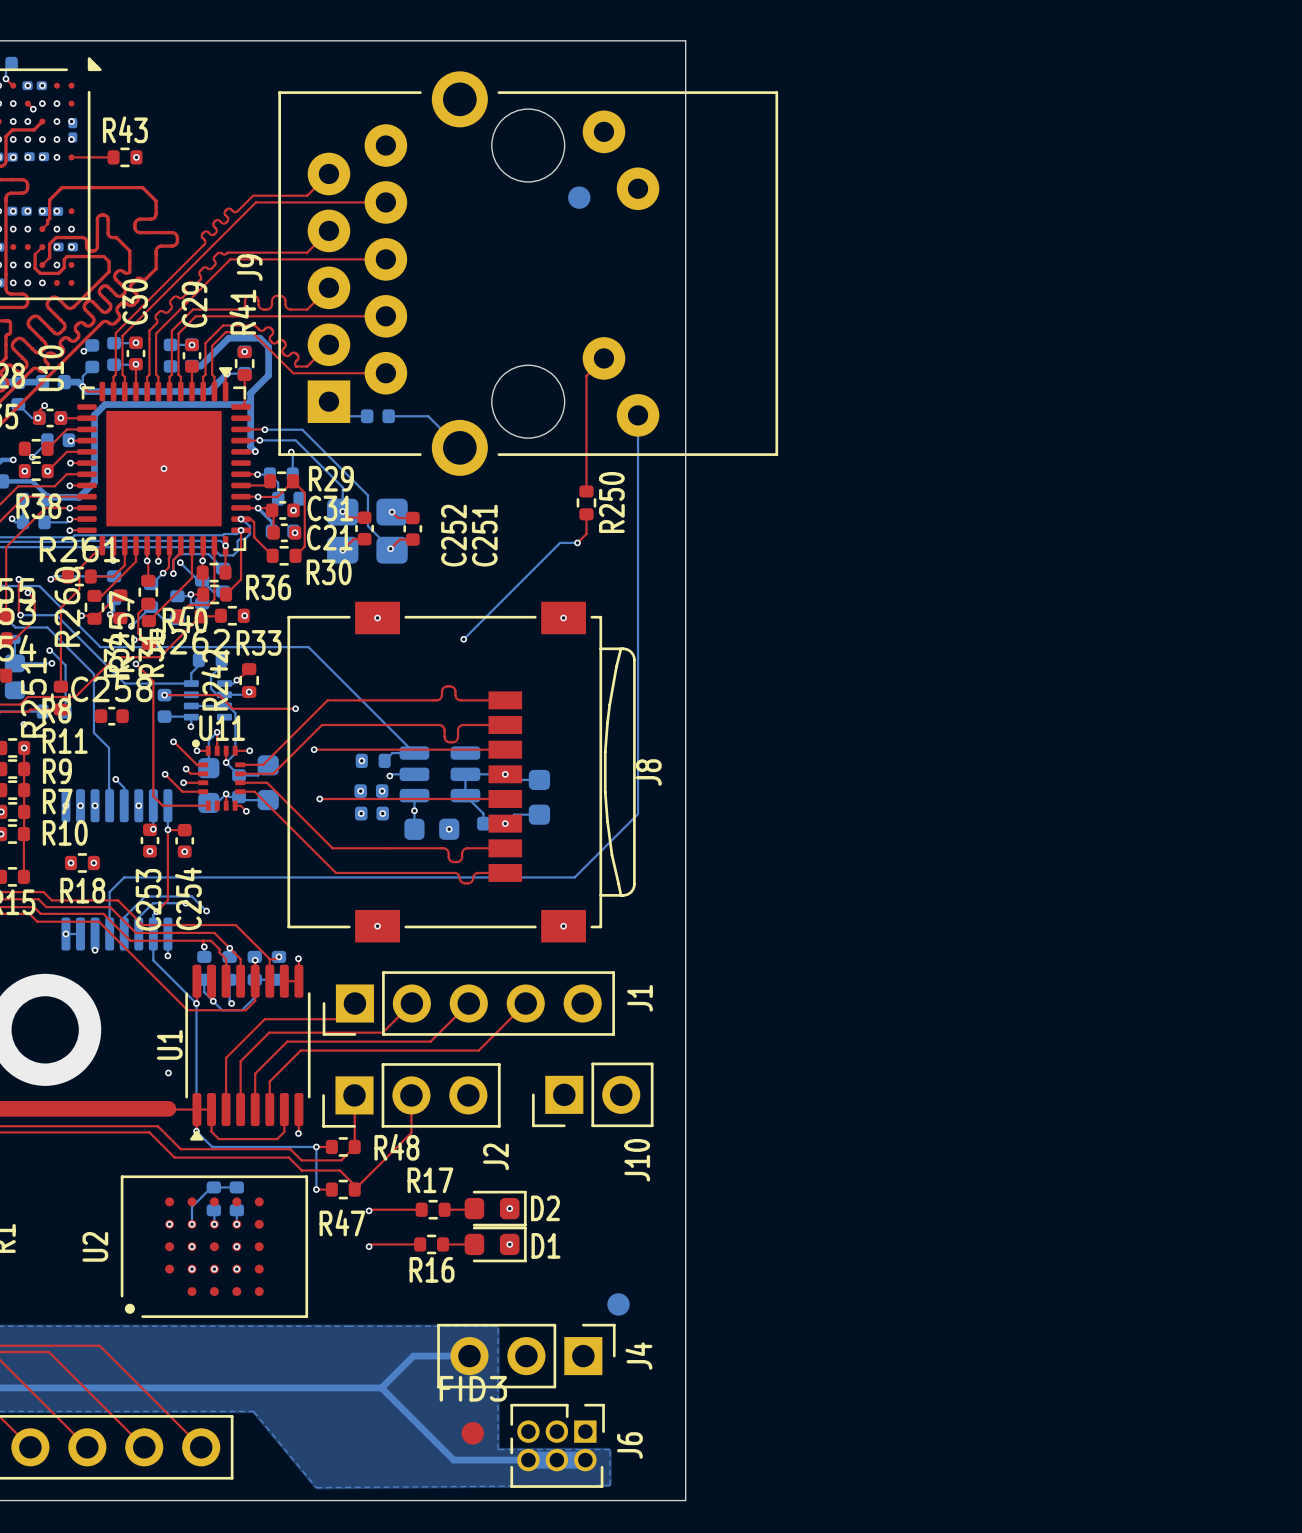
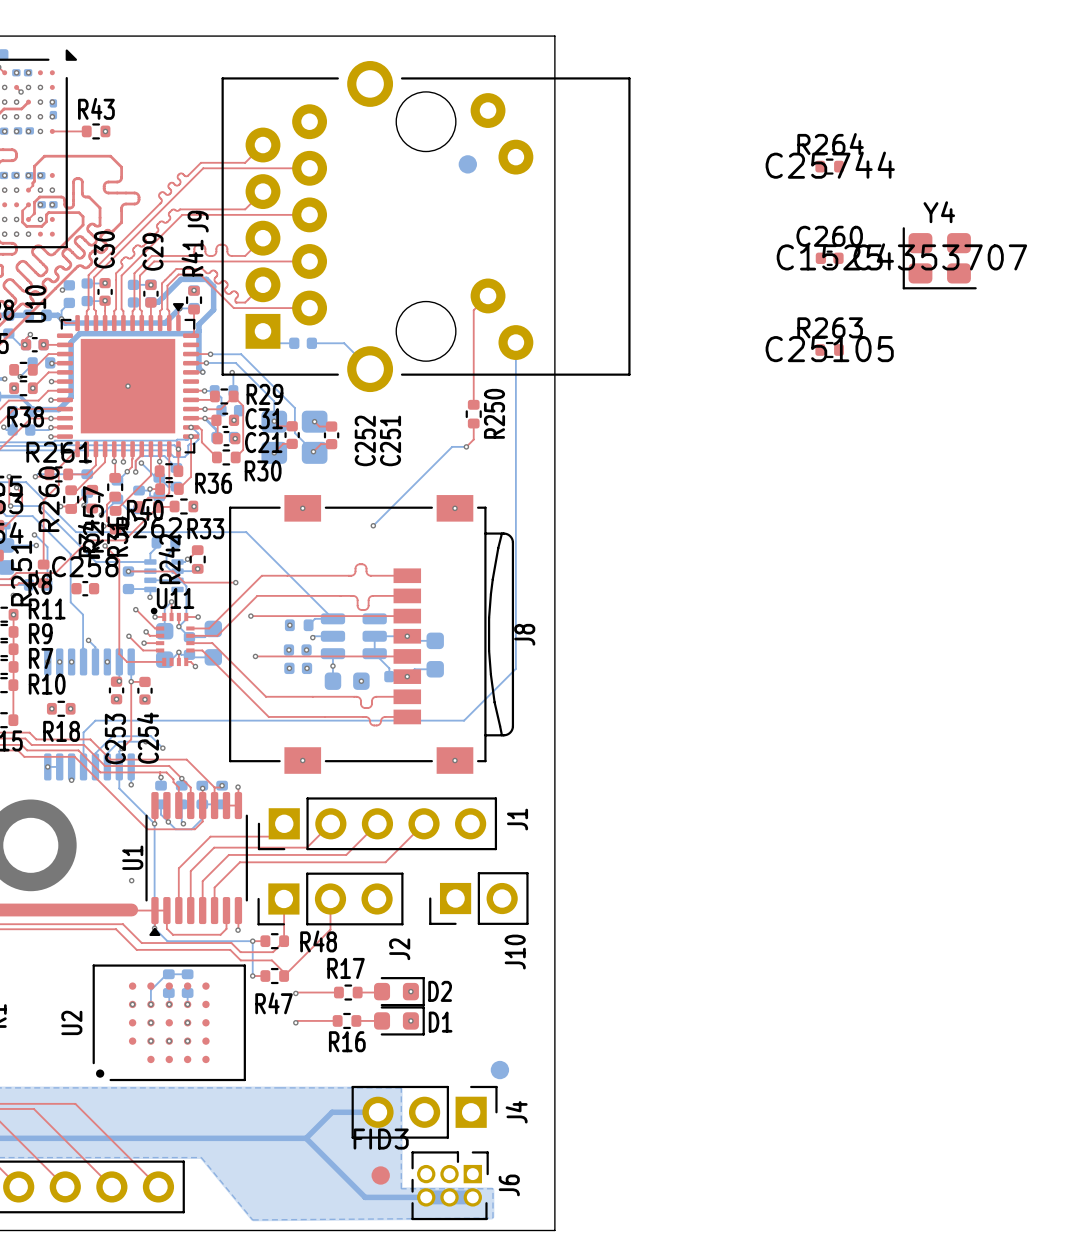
R264: none -> (829, 166)
C260: none -> (829, 258)
Y4: none -> (939, 258)
R263: none -> (829, 349)

